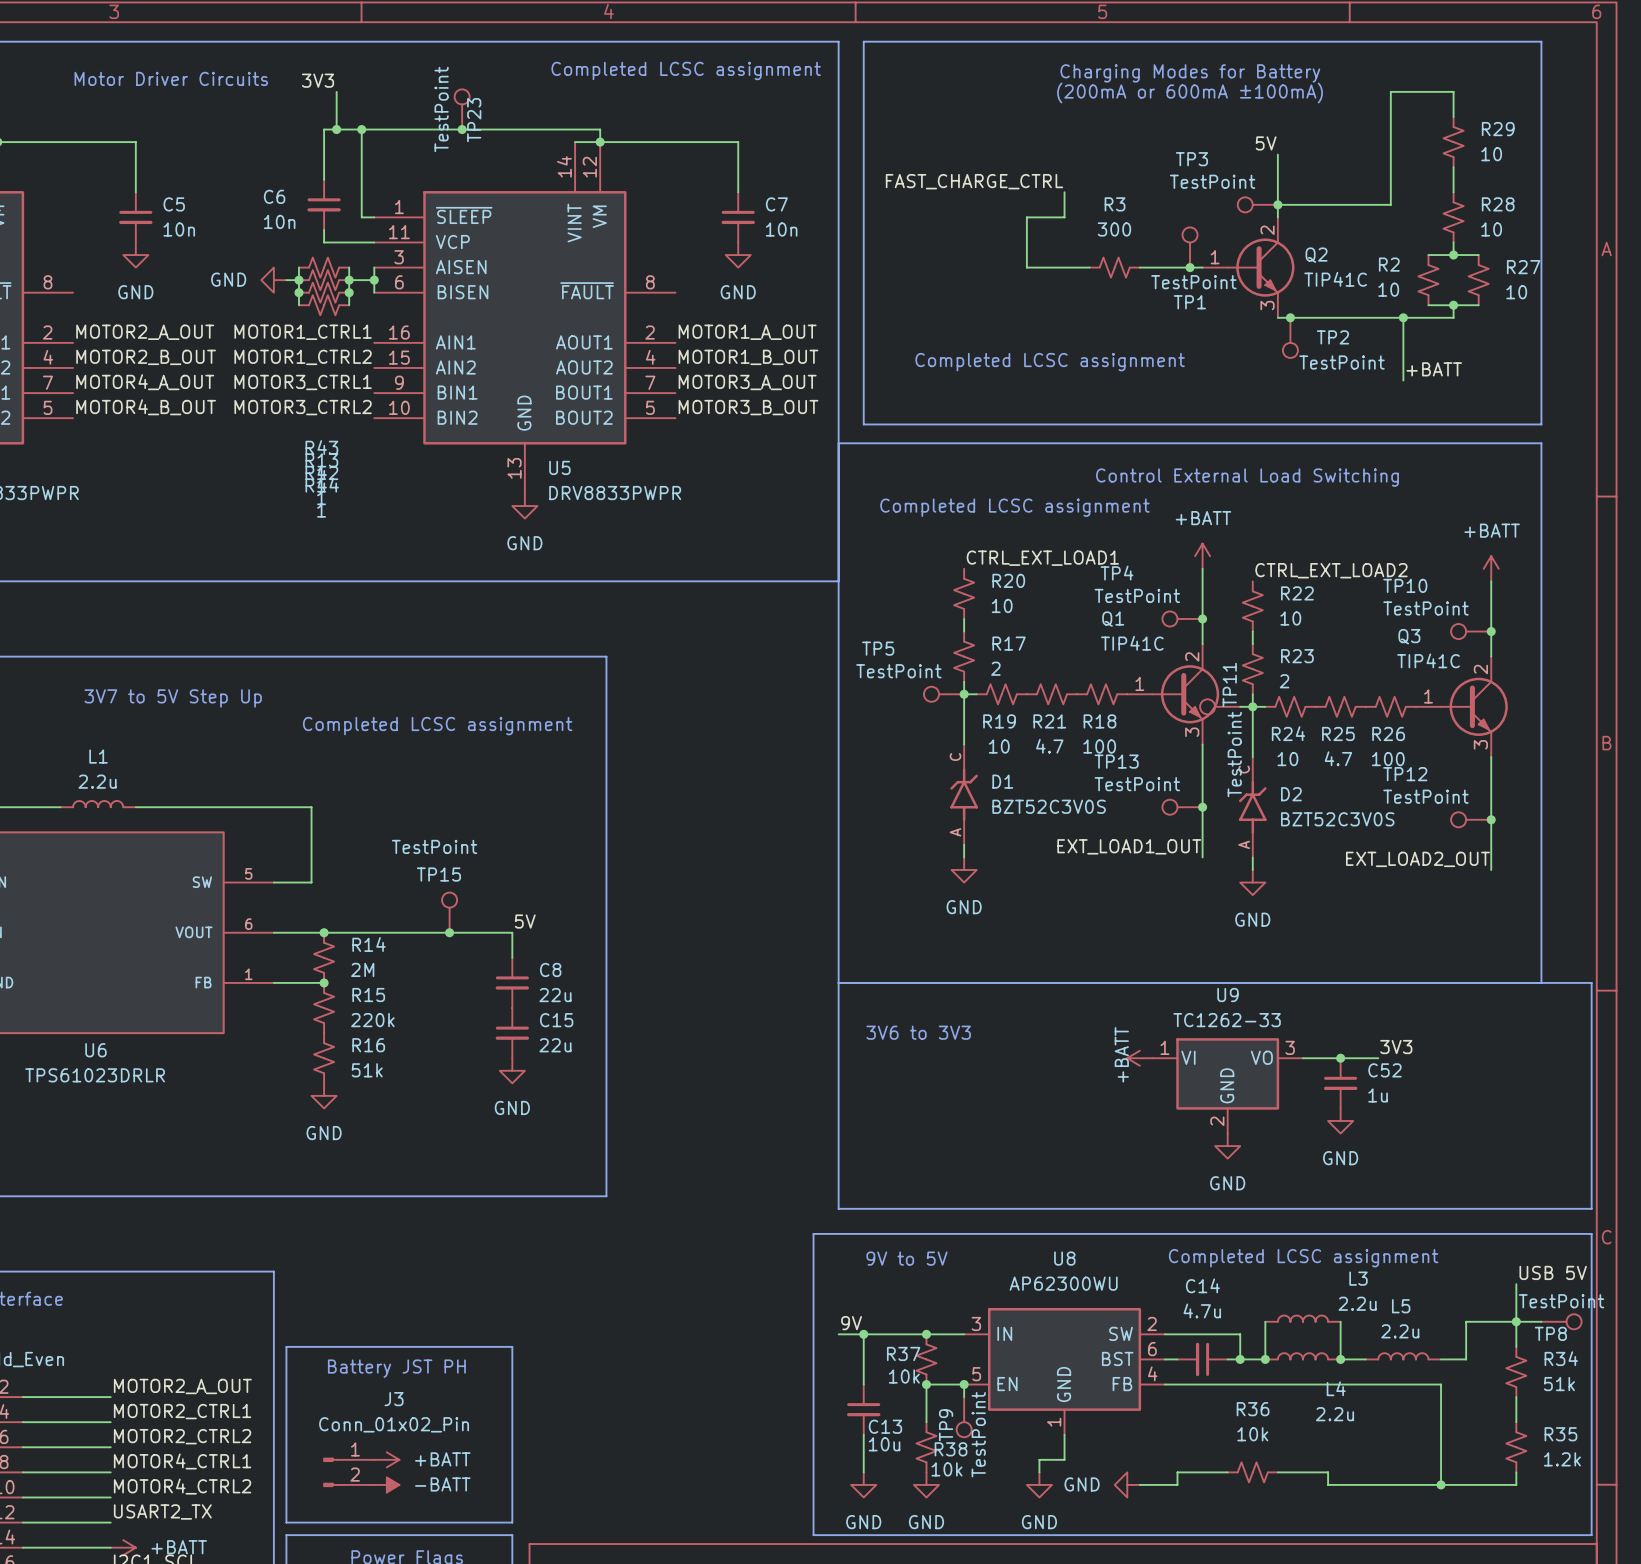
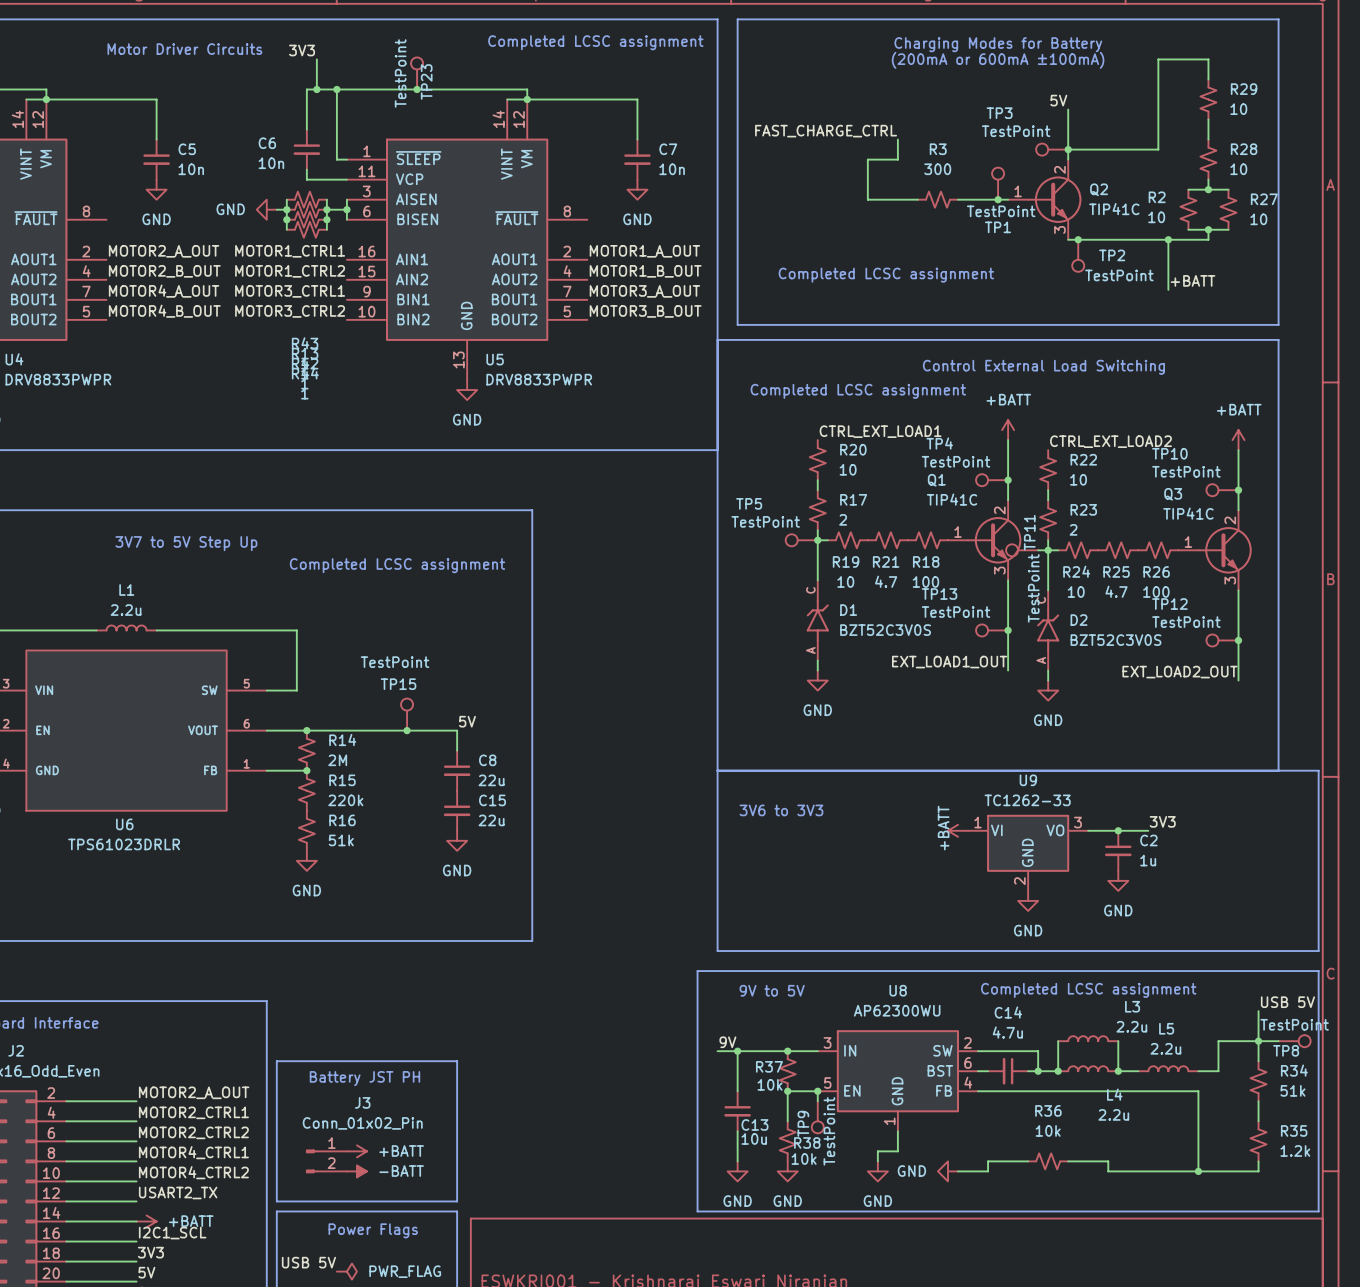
C52 name: C52 (1384, 1070) -> C2 (1148, 840)

